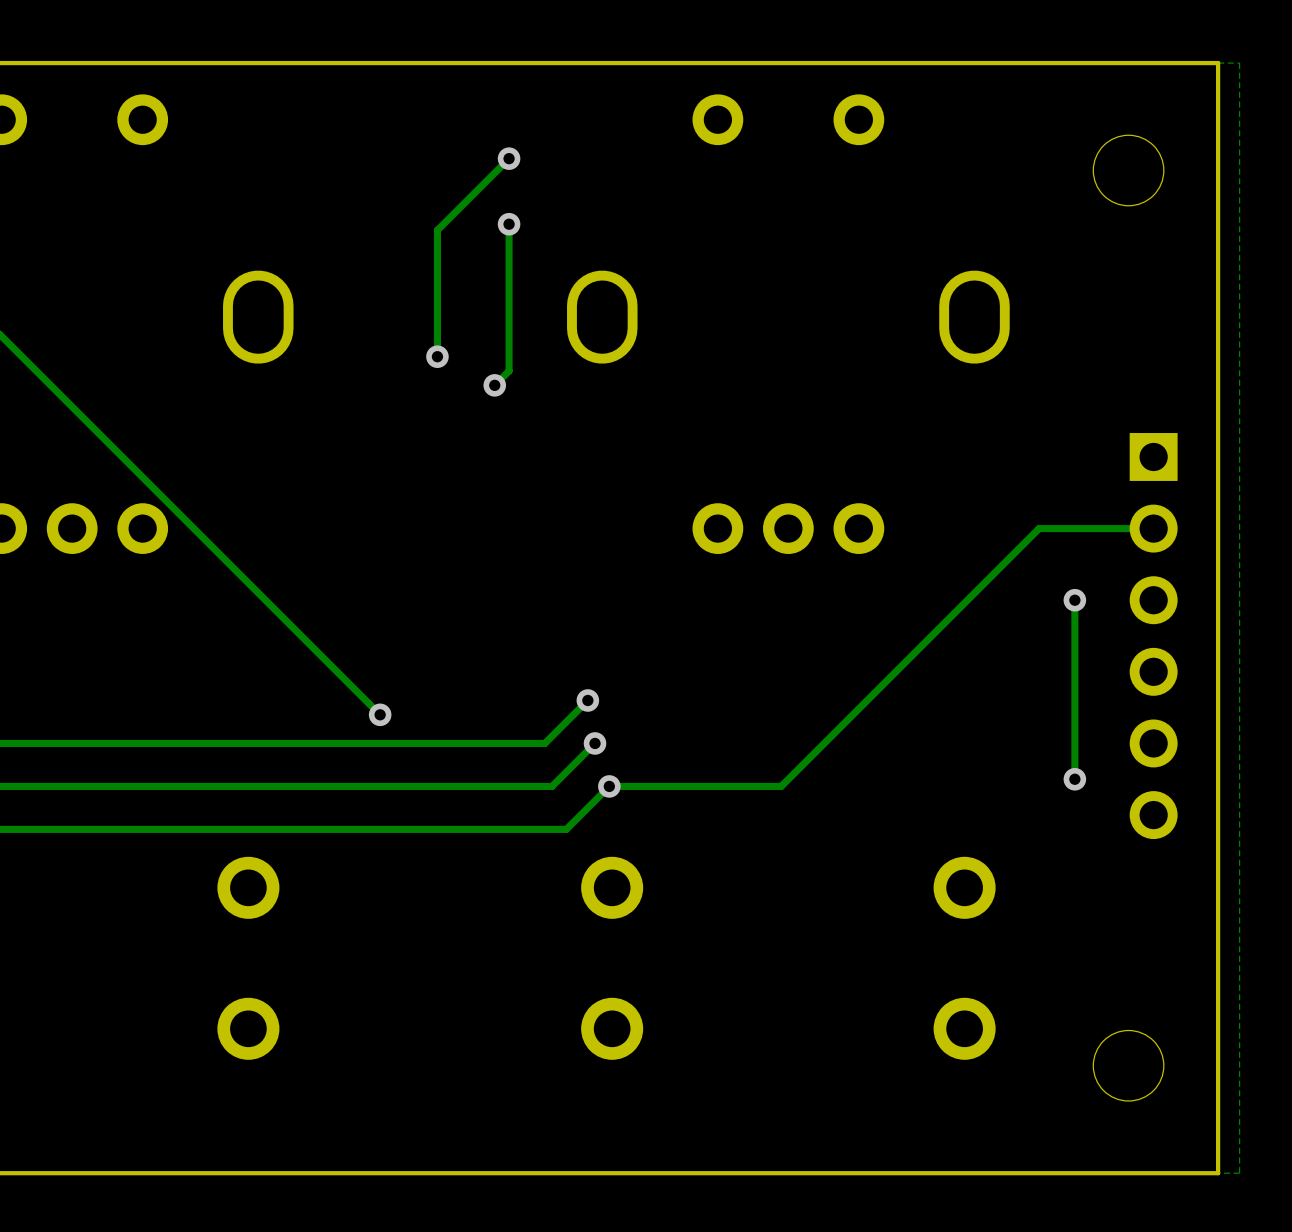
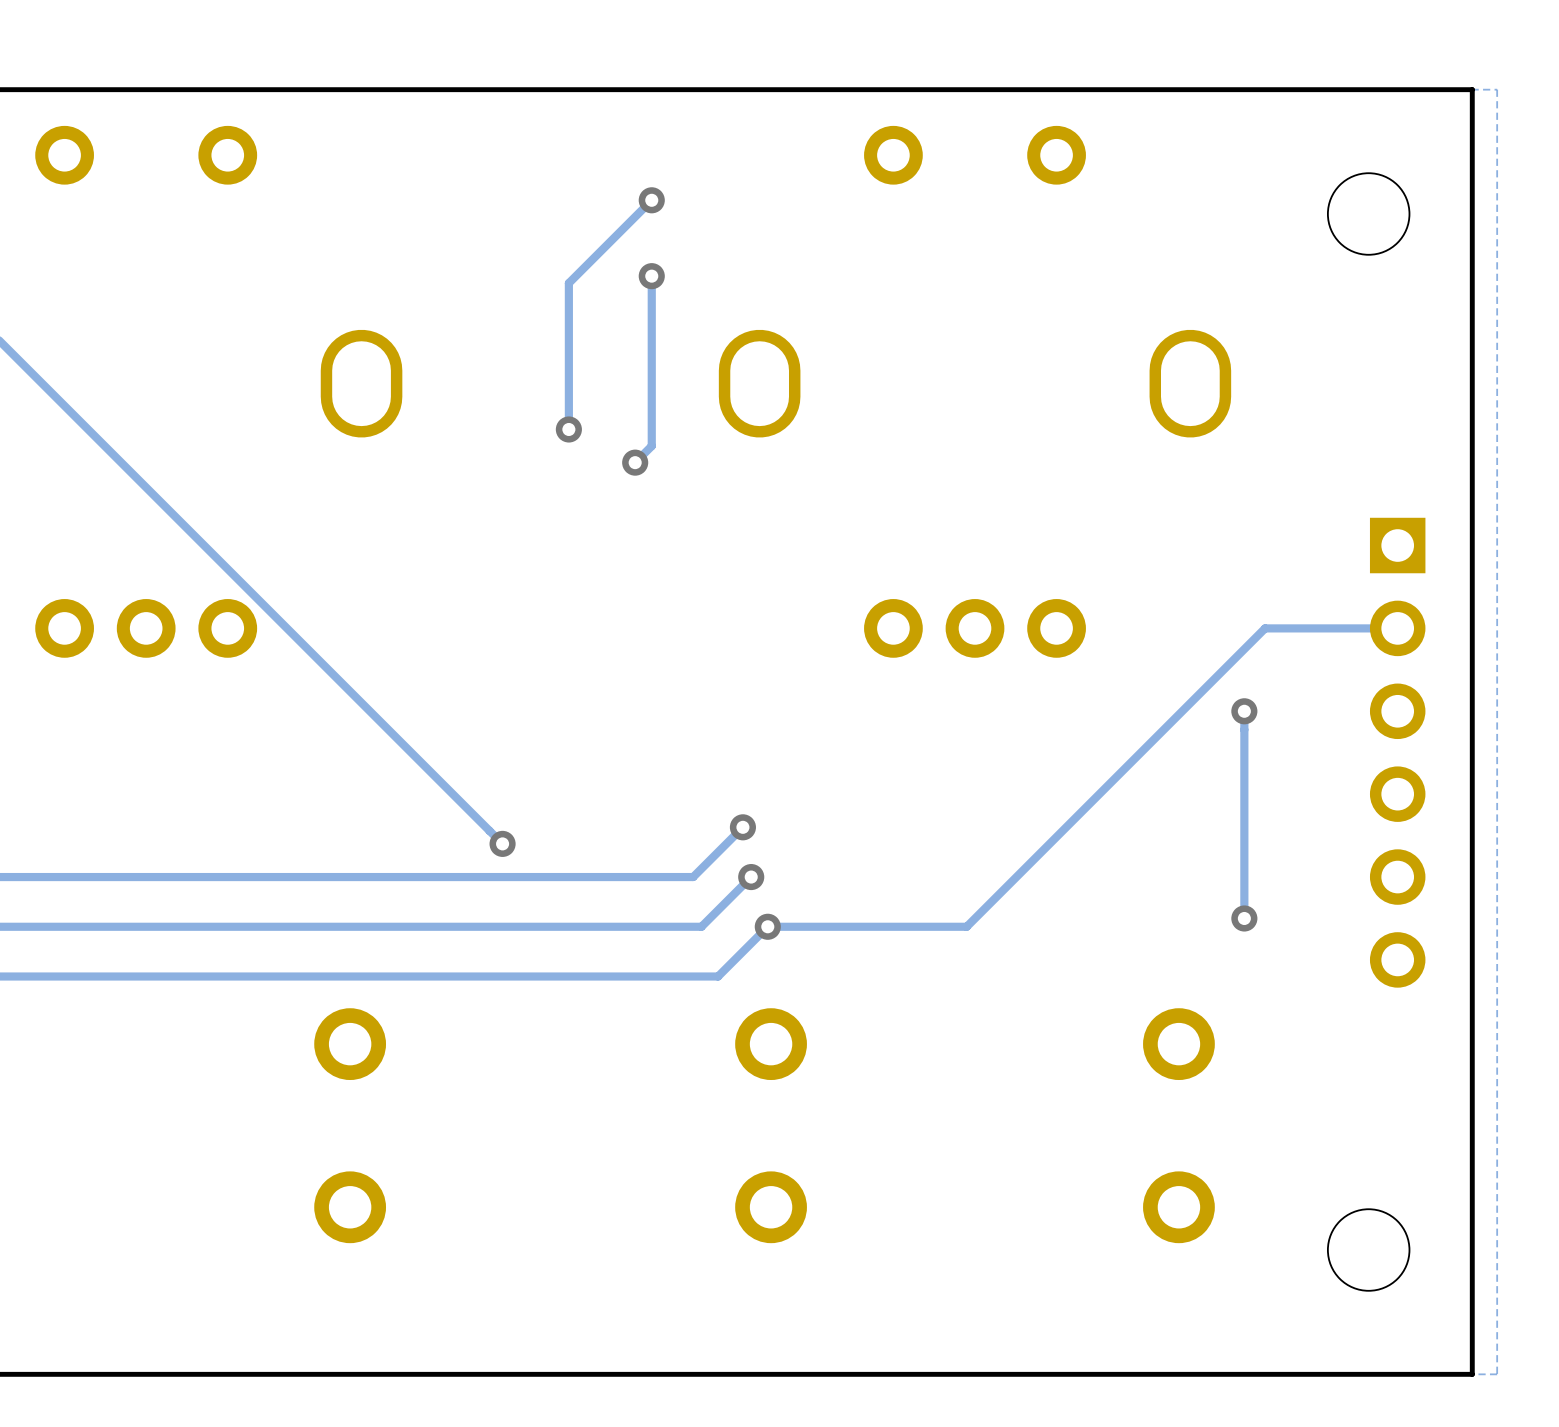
track: (1074, 600) (1074, 779) -> (1244, 711) (1244, 918)
via position: (1074, 600) -> (1244, 711)
via position: (1074, 779) -> (1244, 918)

